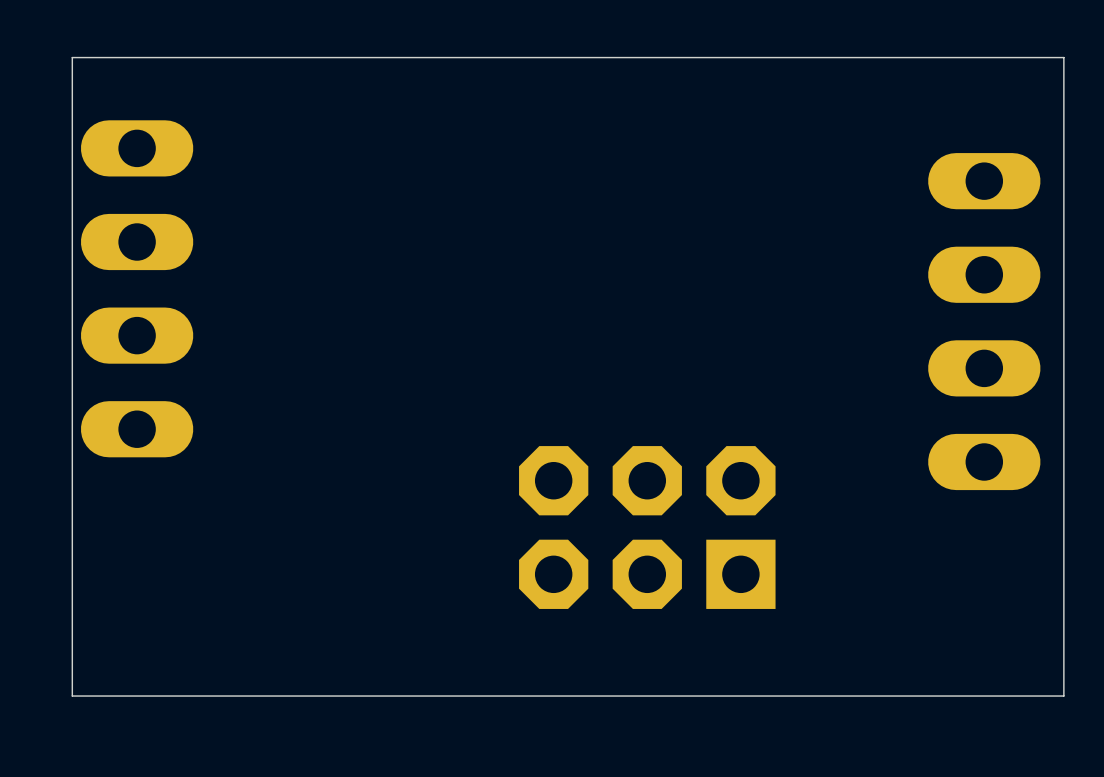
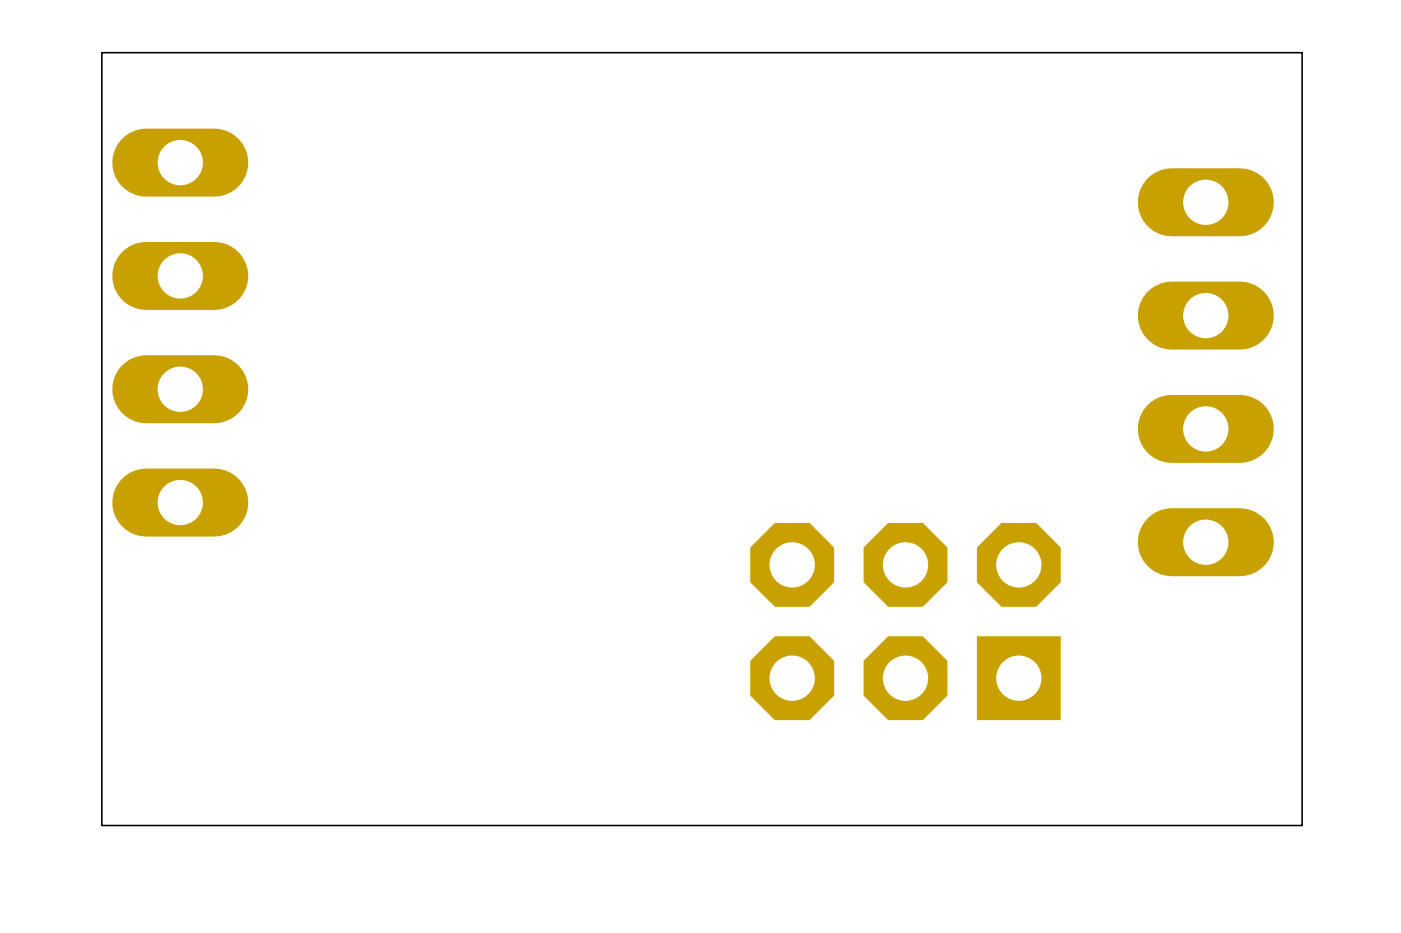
part position: (647, 527) -> (905, 621)

